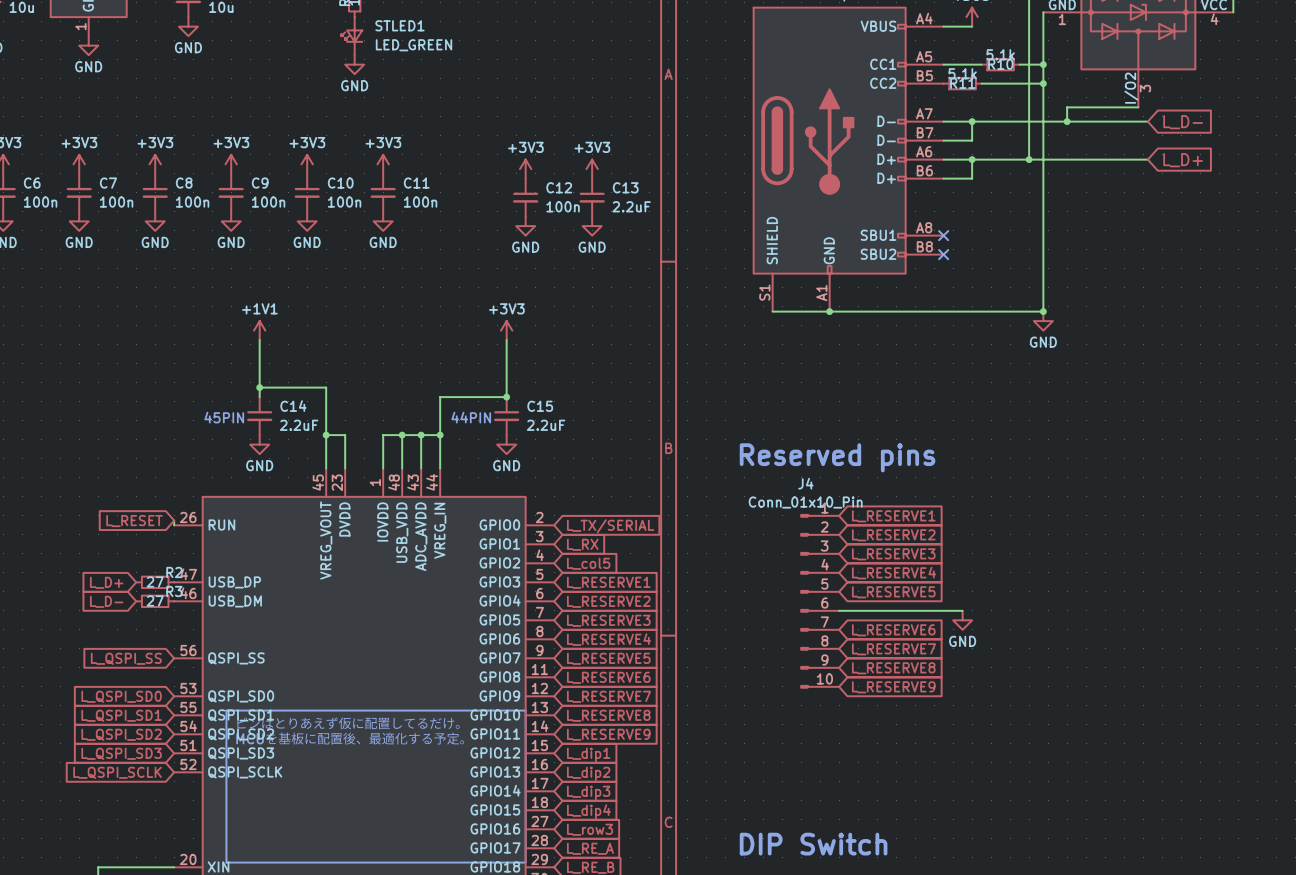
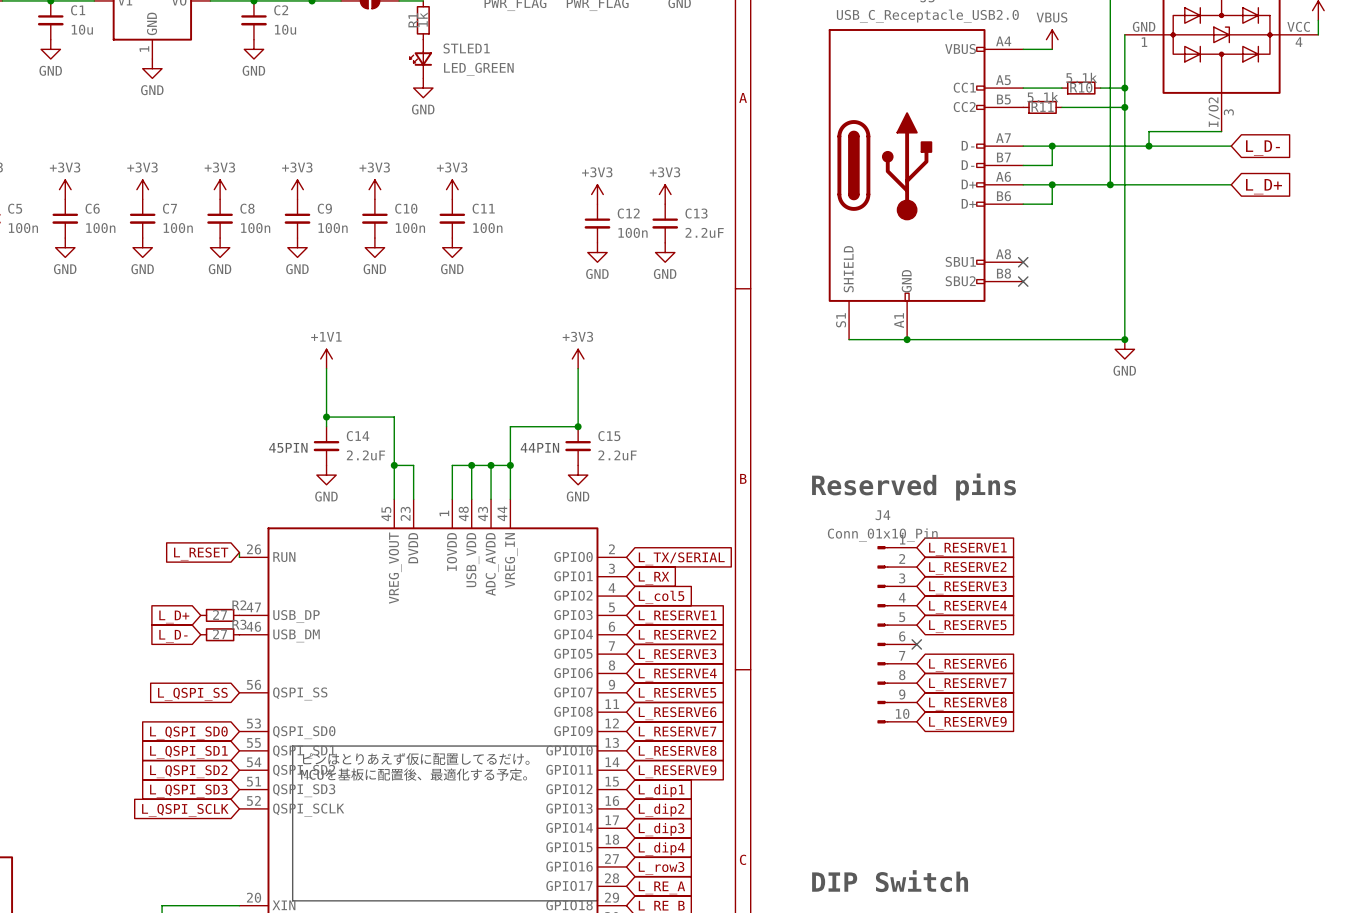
wire: (839, 610) (962, 610) -> none
no-connect mark: none -> (916, 644)
power symbol: GND (962, 620) -> none

